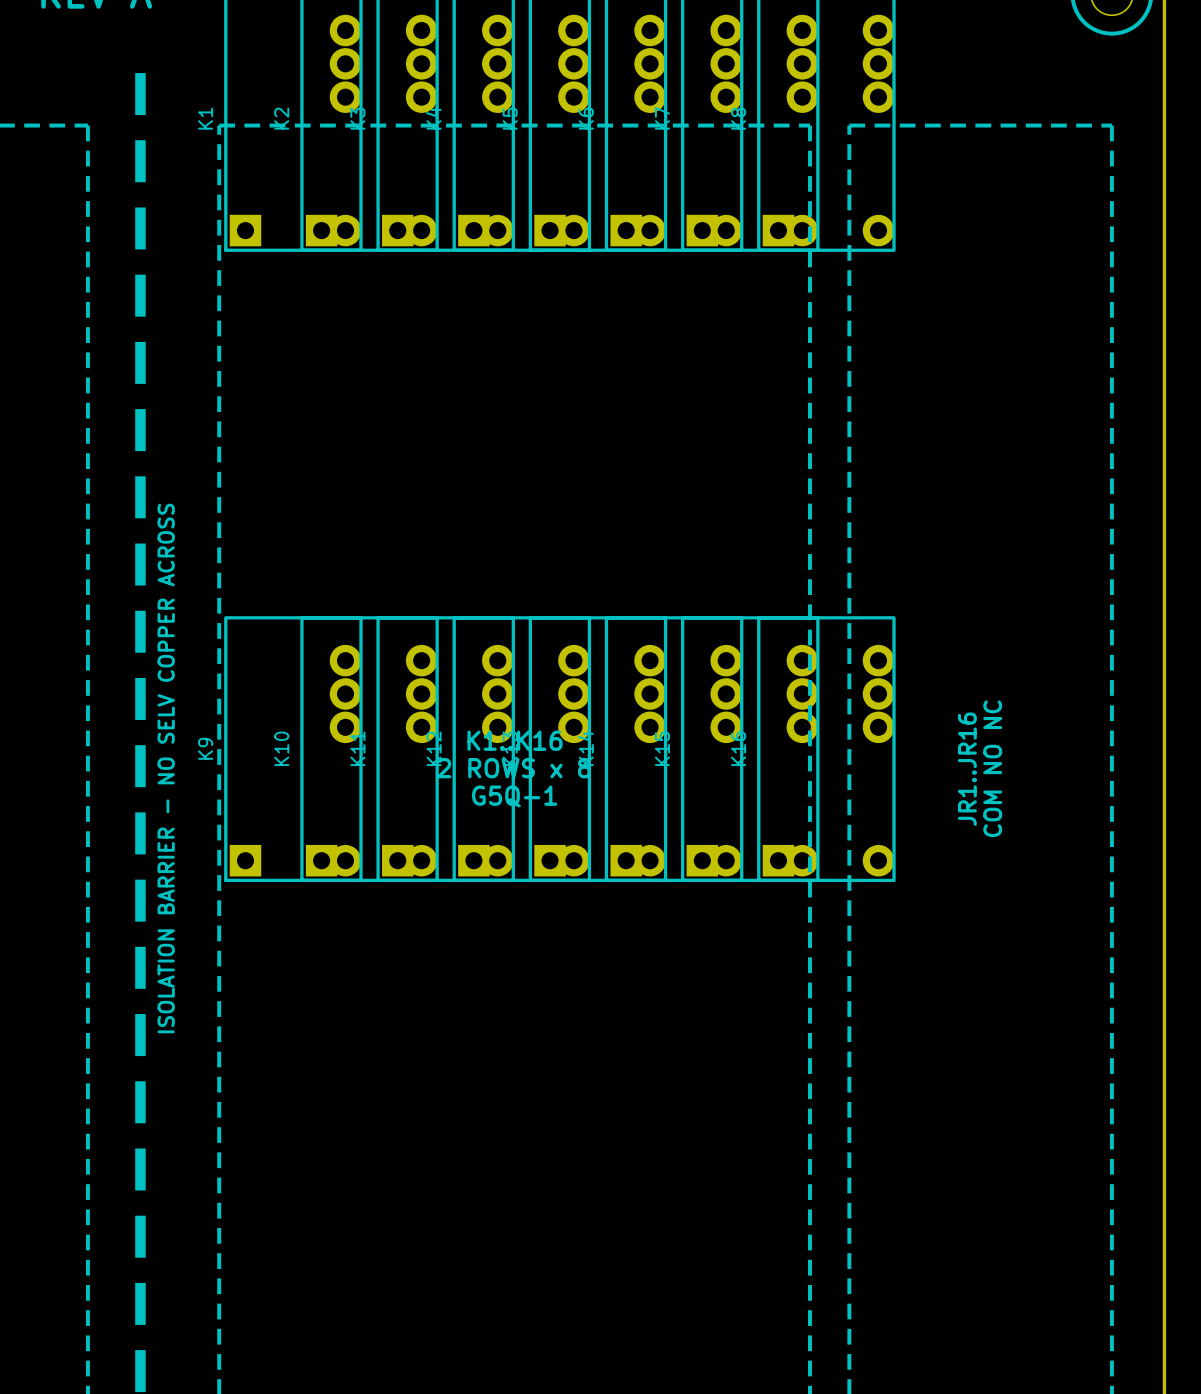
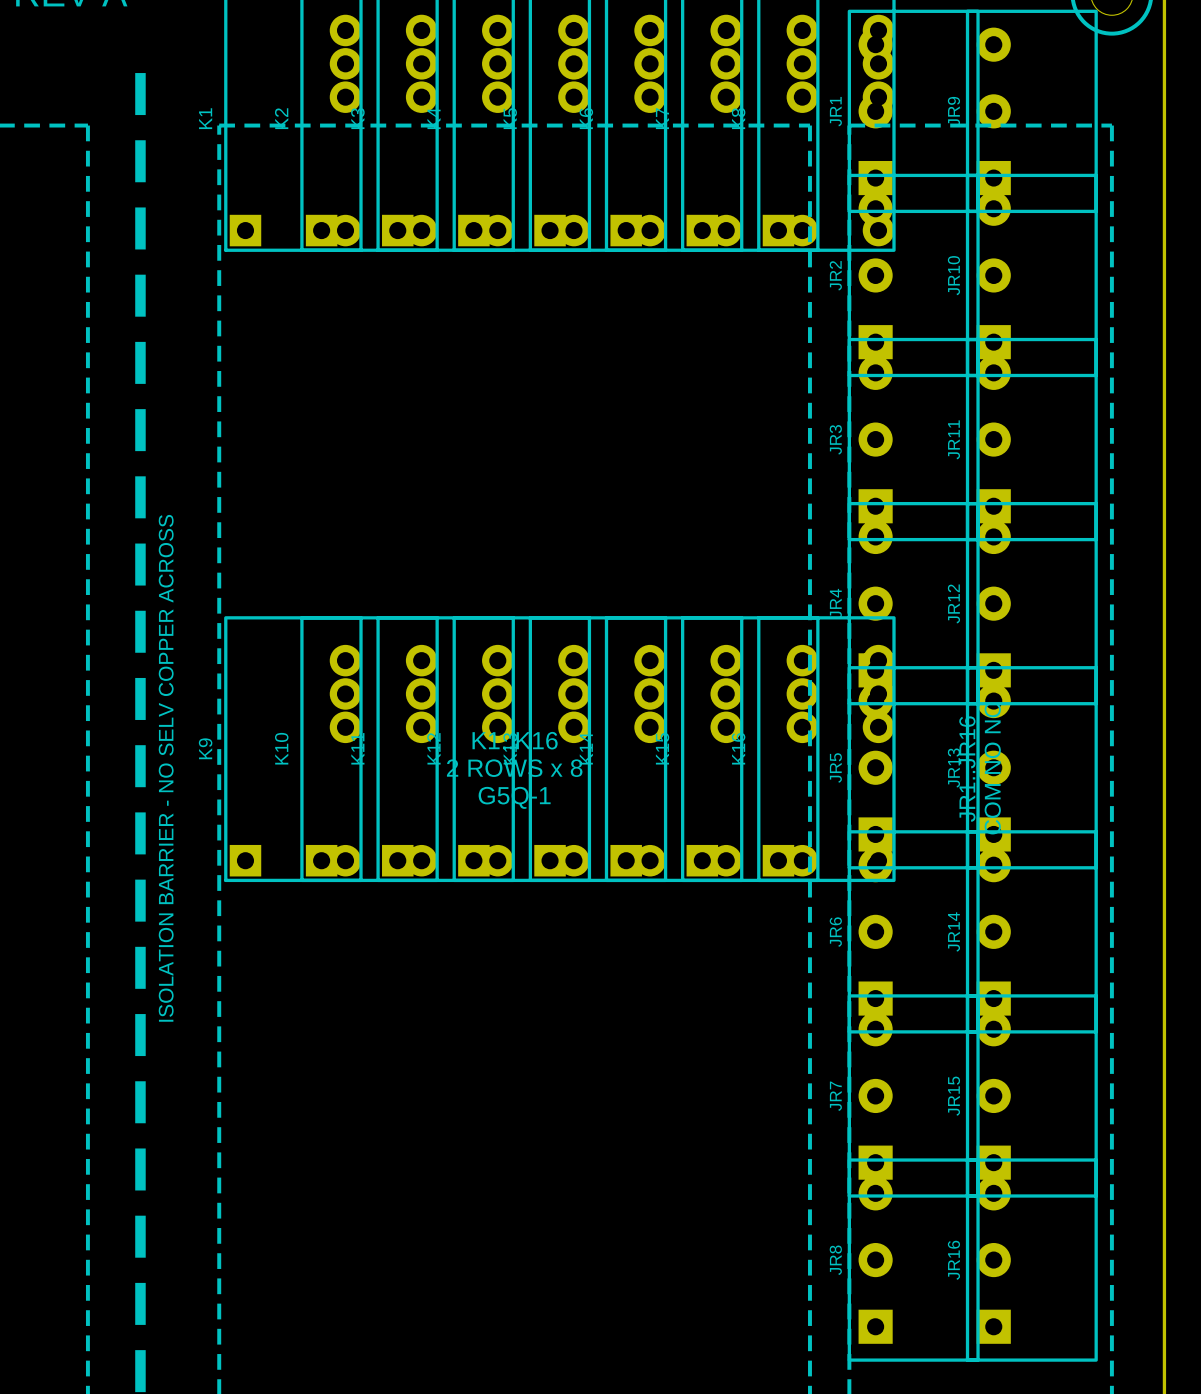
JR1: none -> (913, 111)
JR9: none -> (1031, 111)
JR2: none -> (913, 275)
JR10: none -> (1031, 275)
JR3: none -> (913, 439)
JR11: none -> (1031, 439)
JR4: none -> (913, 603)
JR12: none -> (1031, 603)
JR5: none -> (913, 767)
JR13: none -> (1031, 767)
JR6: none -> (913, 931)
JR14: none -> (1031, 931)
JR7: none -> (913, 1095)
JR15: none -> (1031, 1095)
JR8: none -> (913, 1260)
JR16: none -> (1031, 1260)

